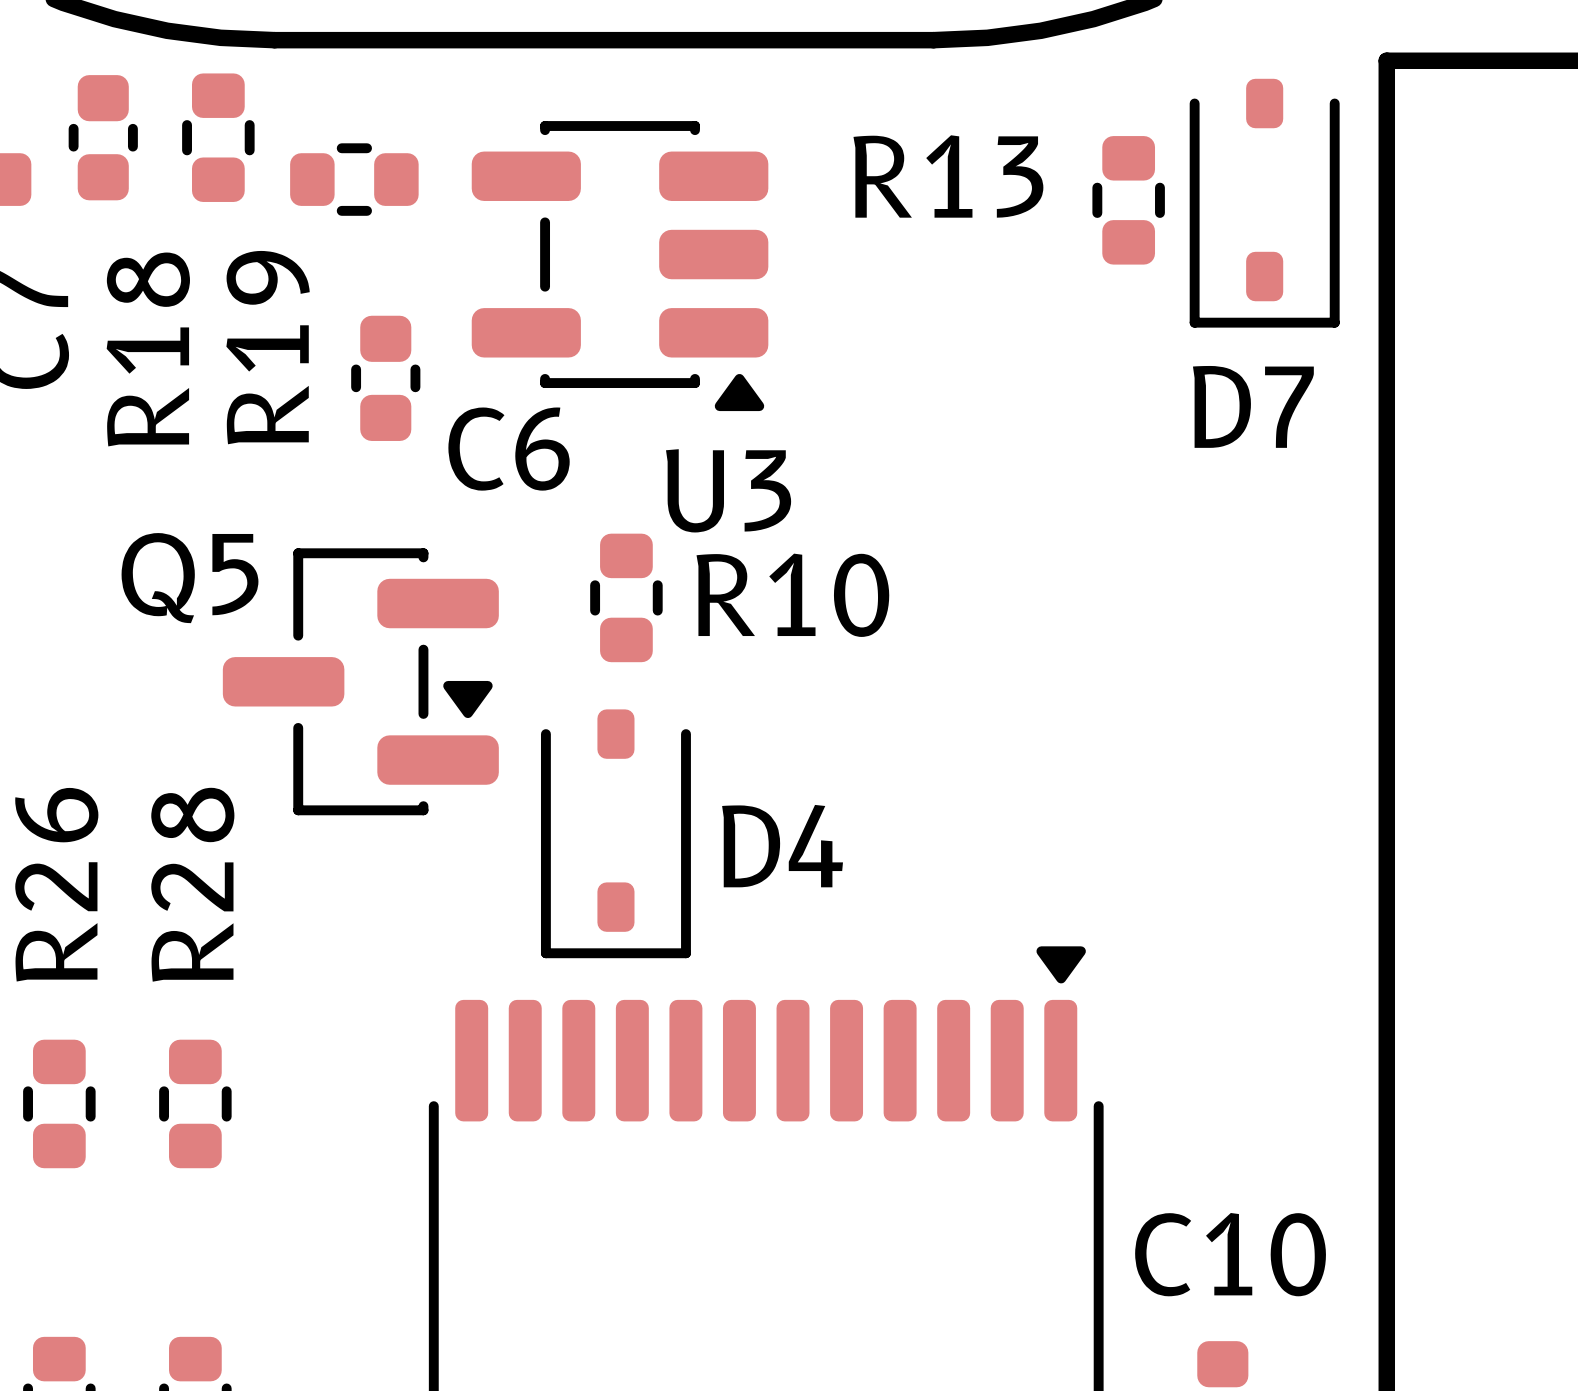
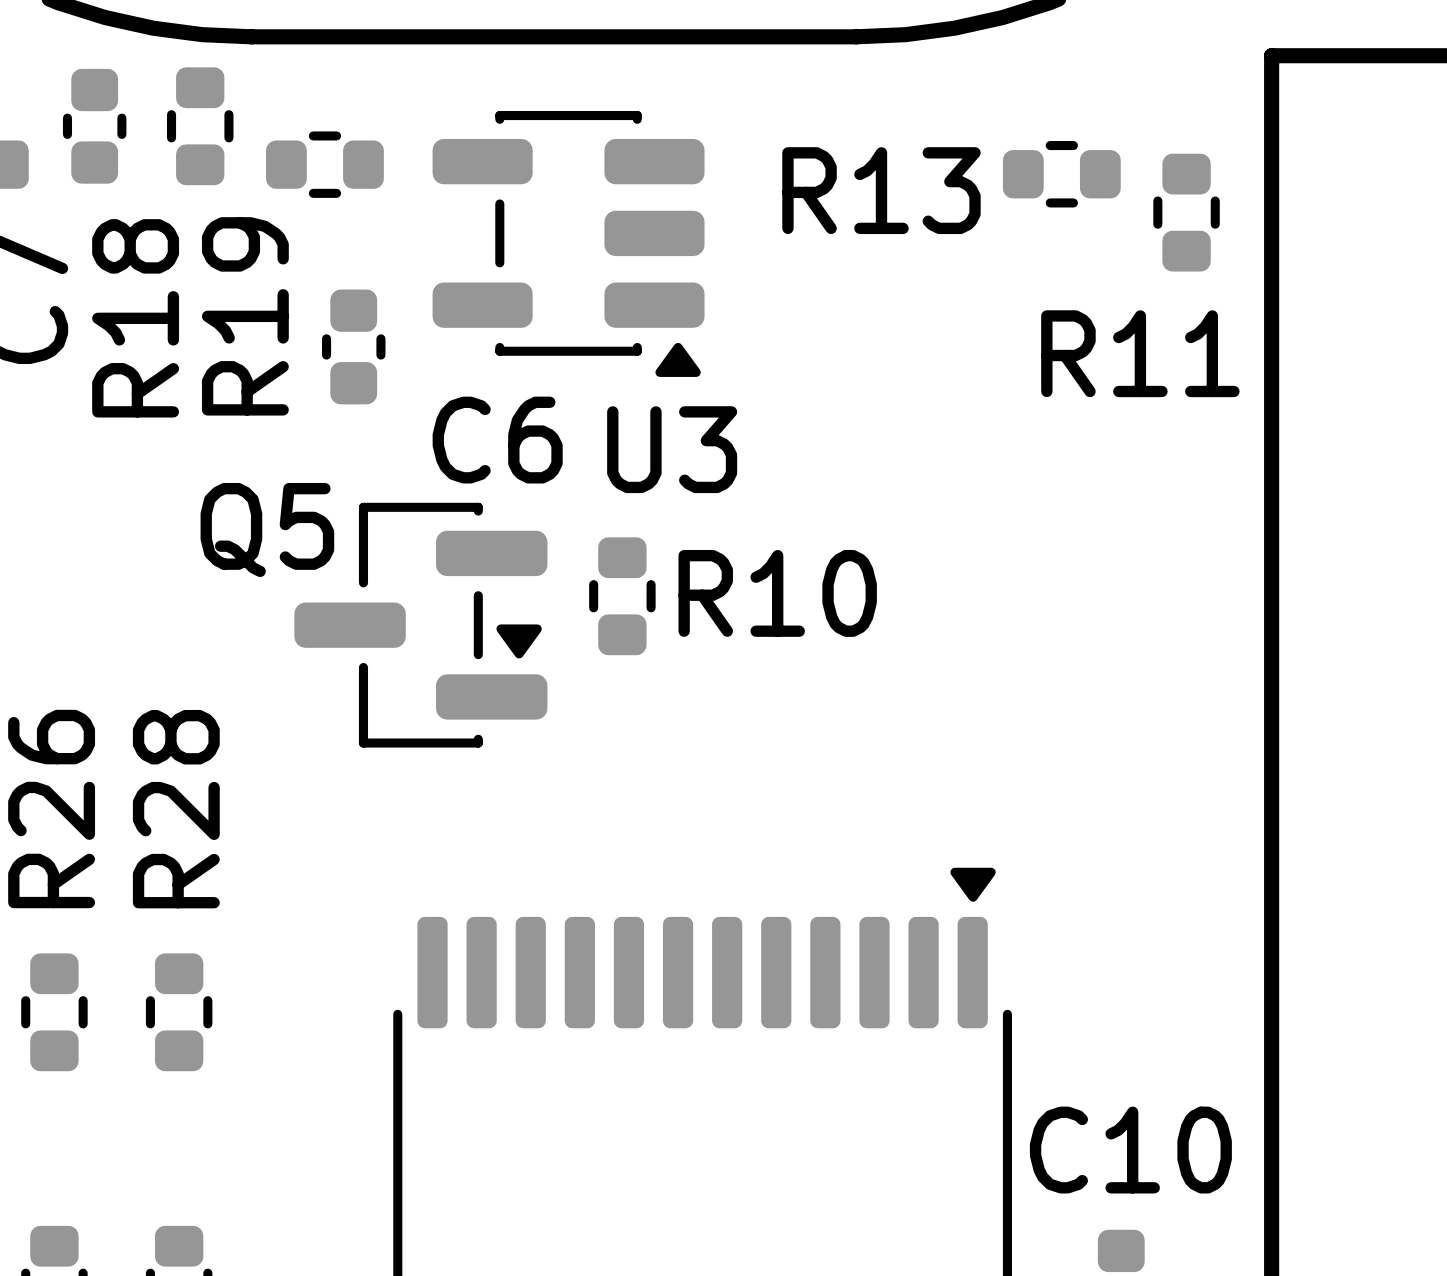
R13 rotation: 0° (1128, 200) -> 90° clockwise (1061, 174)
D7: (1264, 203) -> none
R11: none -> (1186, 212)
C6 name position: C6 (509, 449) -> C6 (497, 440)
R10 position: (626, 597) -> (622, 596)
Q5 position: (360, 681) -> (420, 625)
D4: (615, 833) -> none

